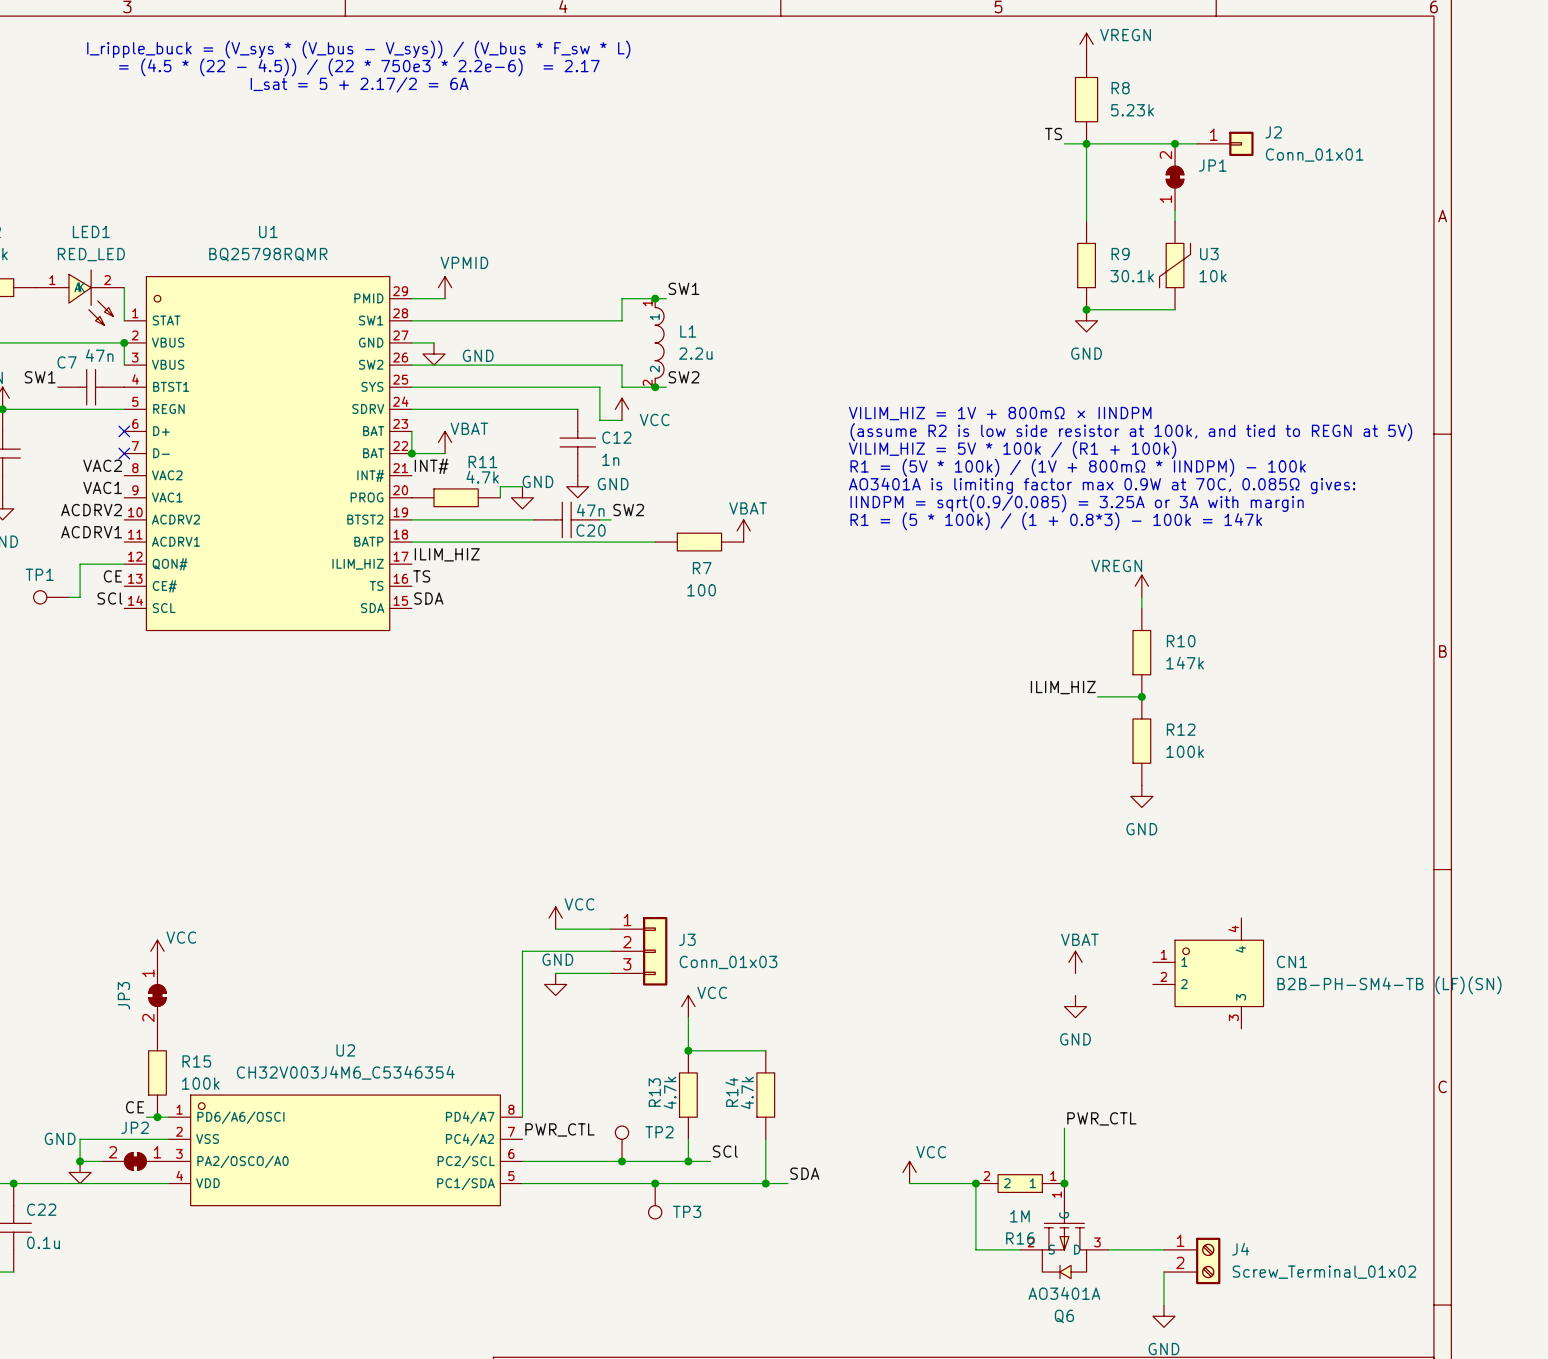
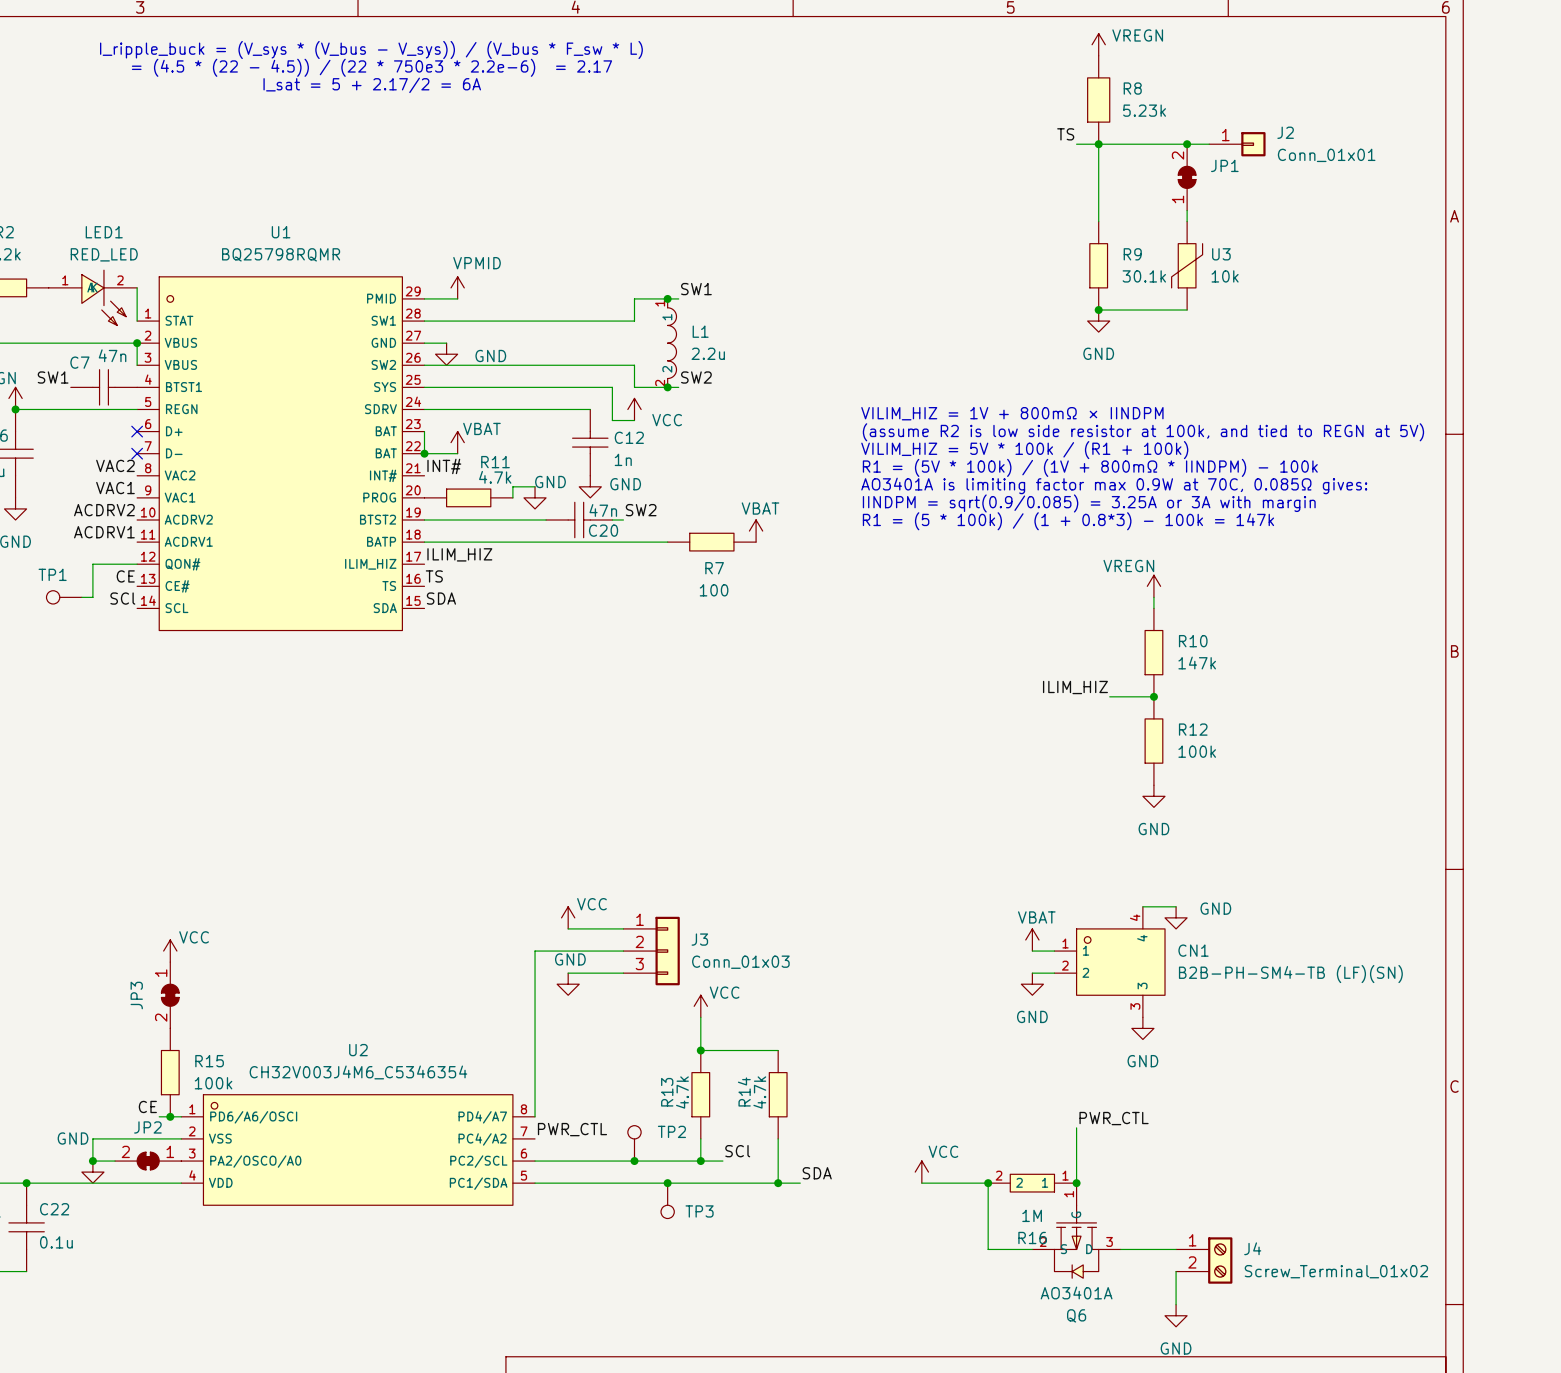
wire: none -> (1142, 906) (1176, 906)
power symbol: none -> GND (1176, 917)
wire: none -> (1032, 951) (1054, 951)
power symbol position: VBAT (1075, 962) -> VBAT (1032, 939)
wire: none -> (1032, 973) (1054, 973)
CN1 position: (1208, 973) -> (1109, 962)
power symbol: none -> GND (1032, 984)
power symbol: GND (1075, 1006) -> none
power symbol: none -> GND (1142, 1028)

